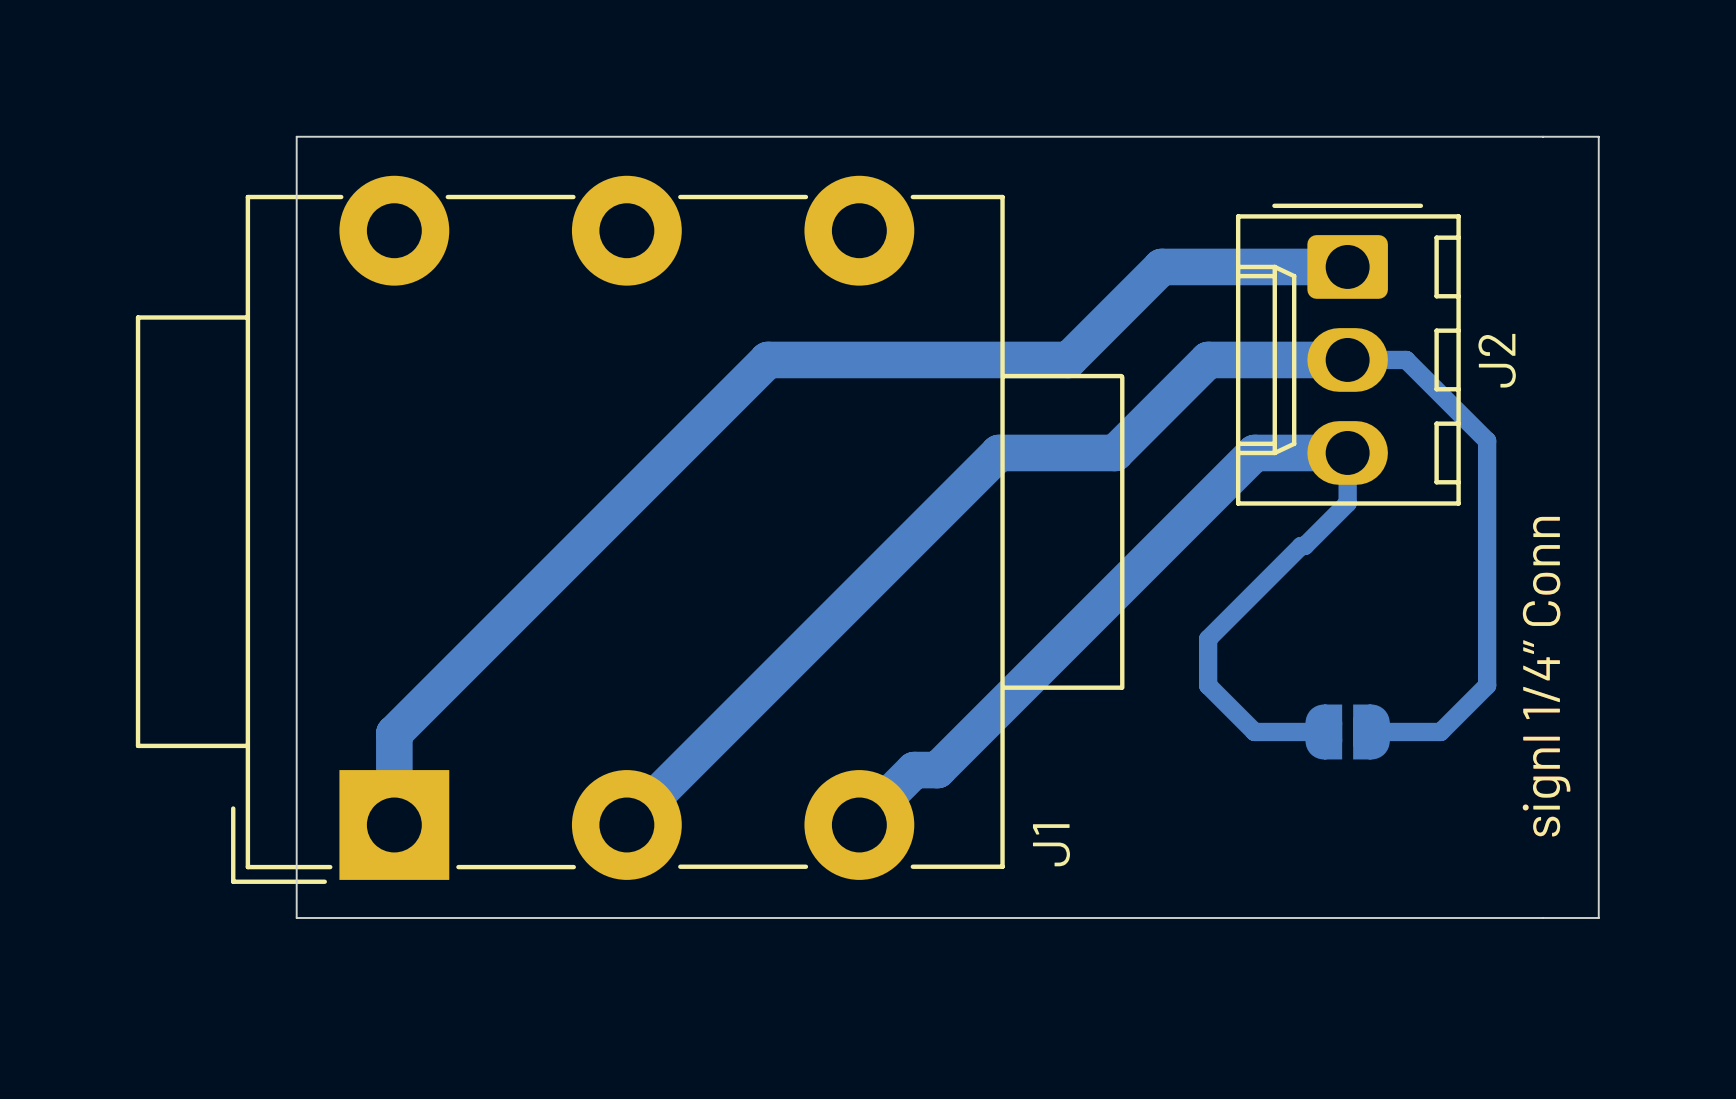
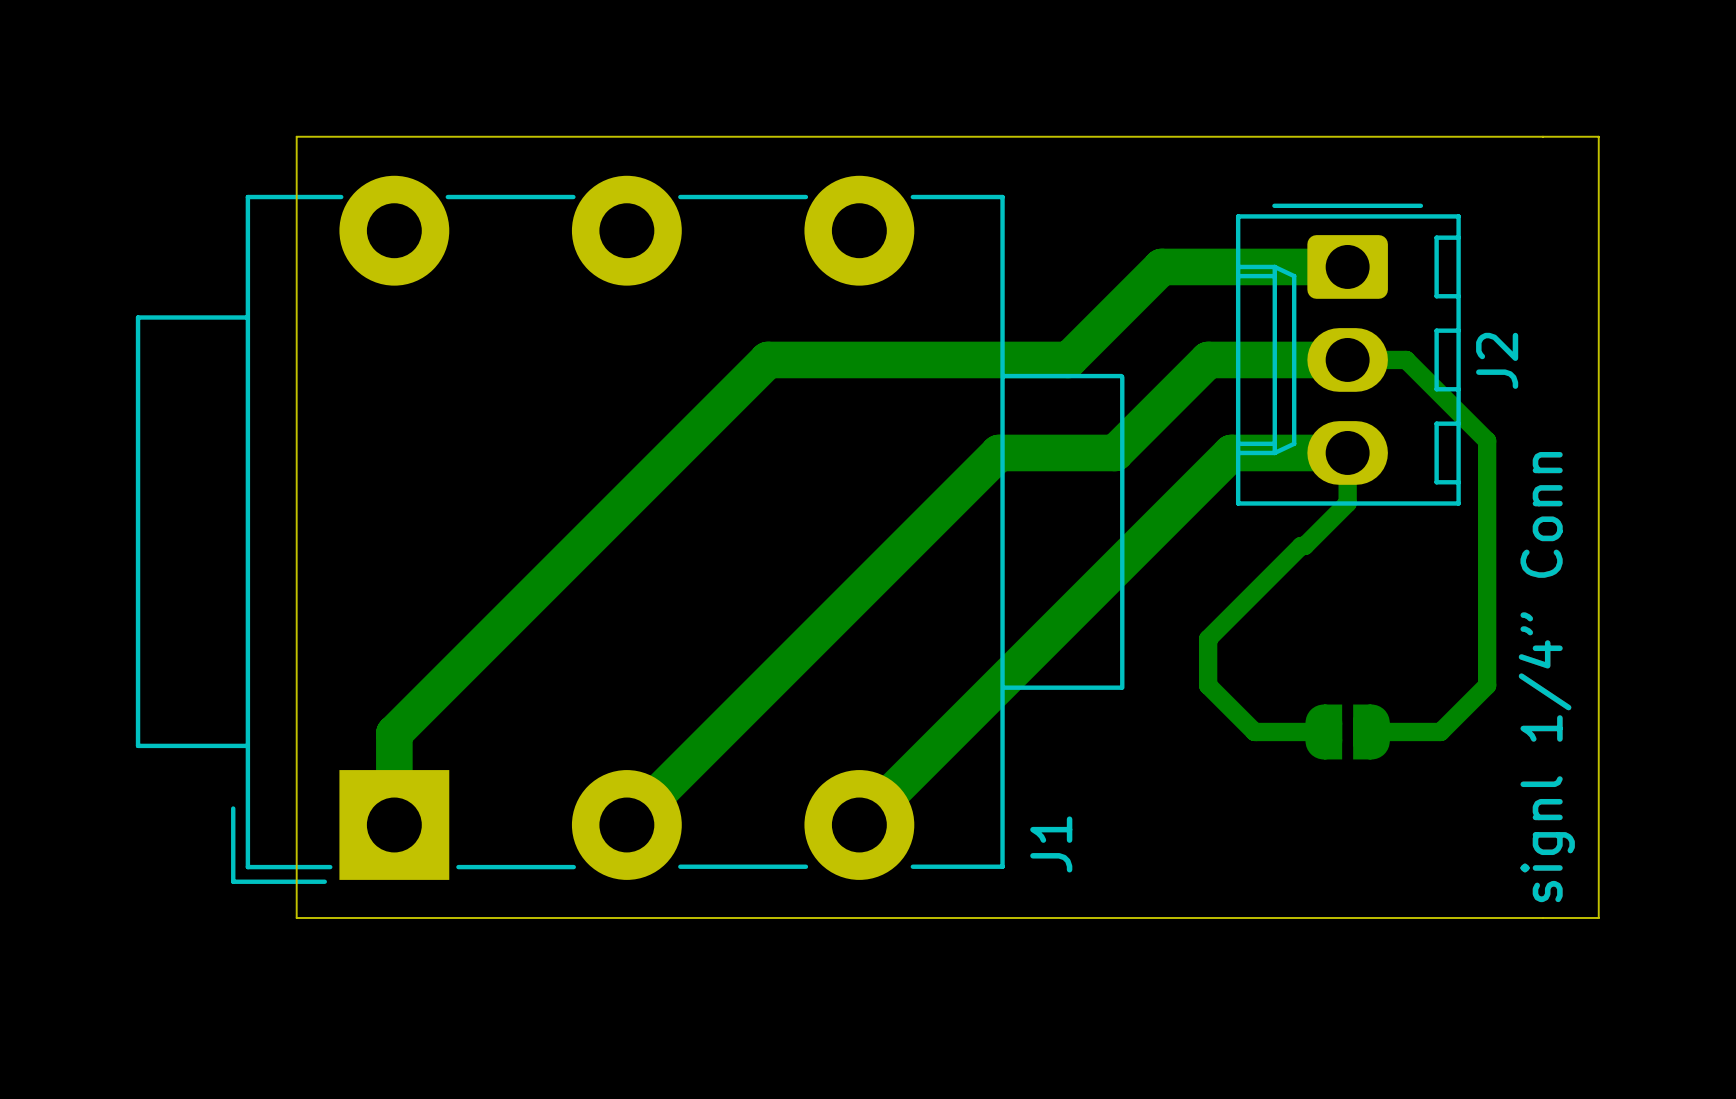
bottom track: (1254, 452) (937, 770) (914, 770) -> (1254, 452) (1231, 452) (914, 770)

